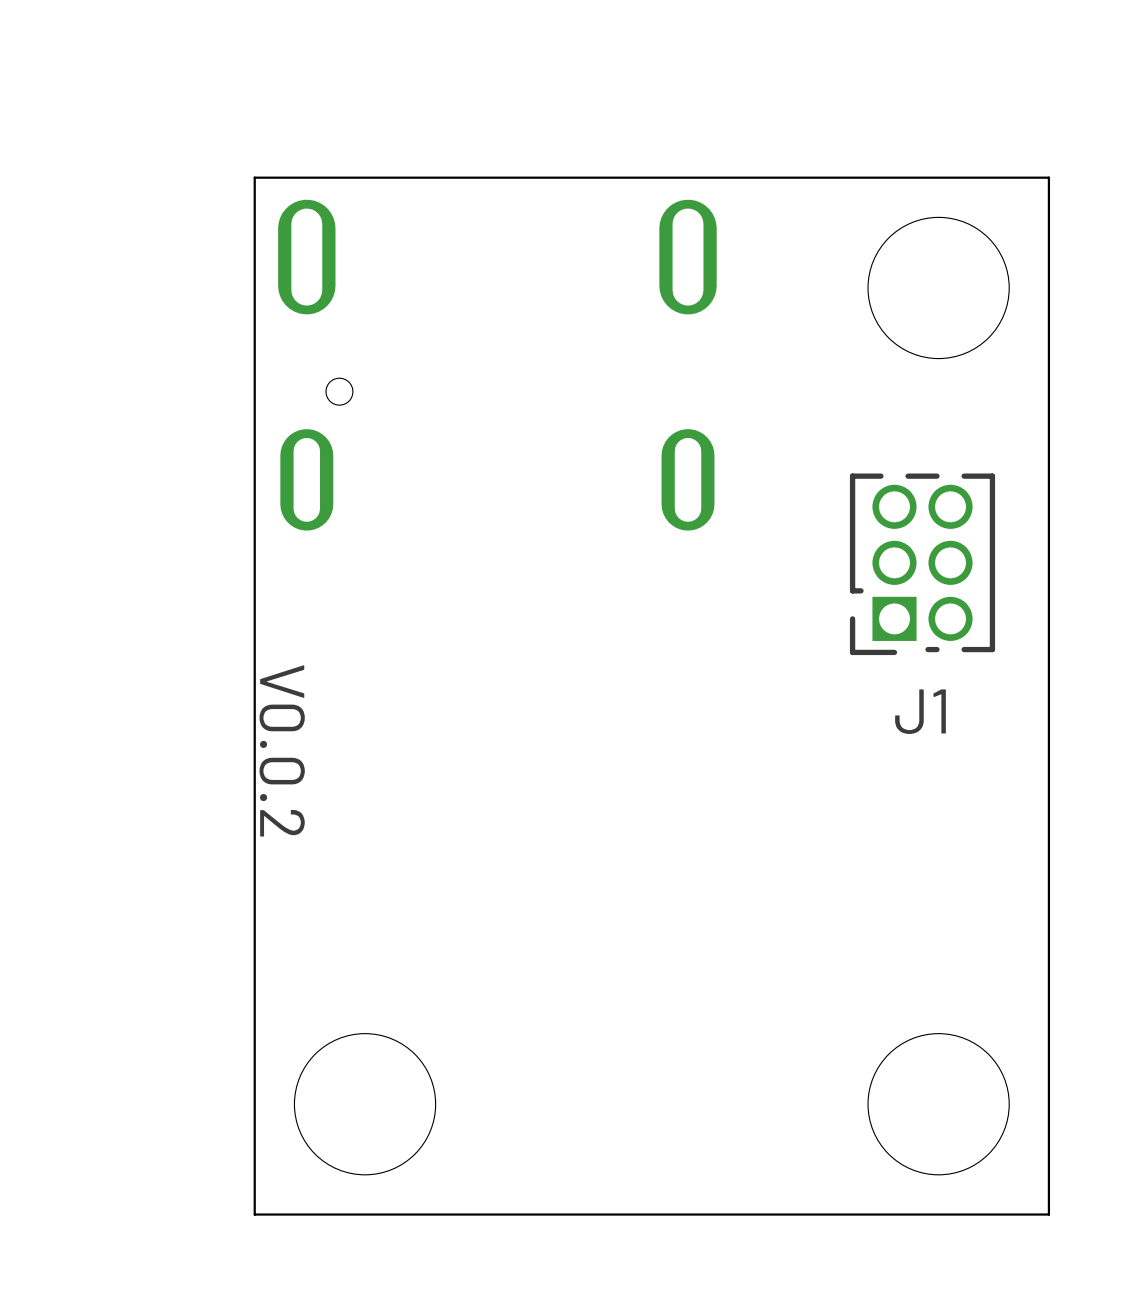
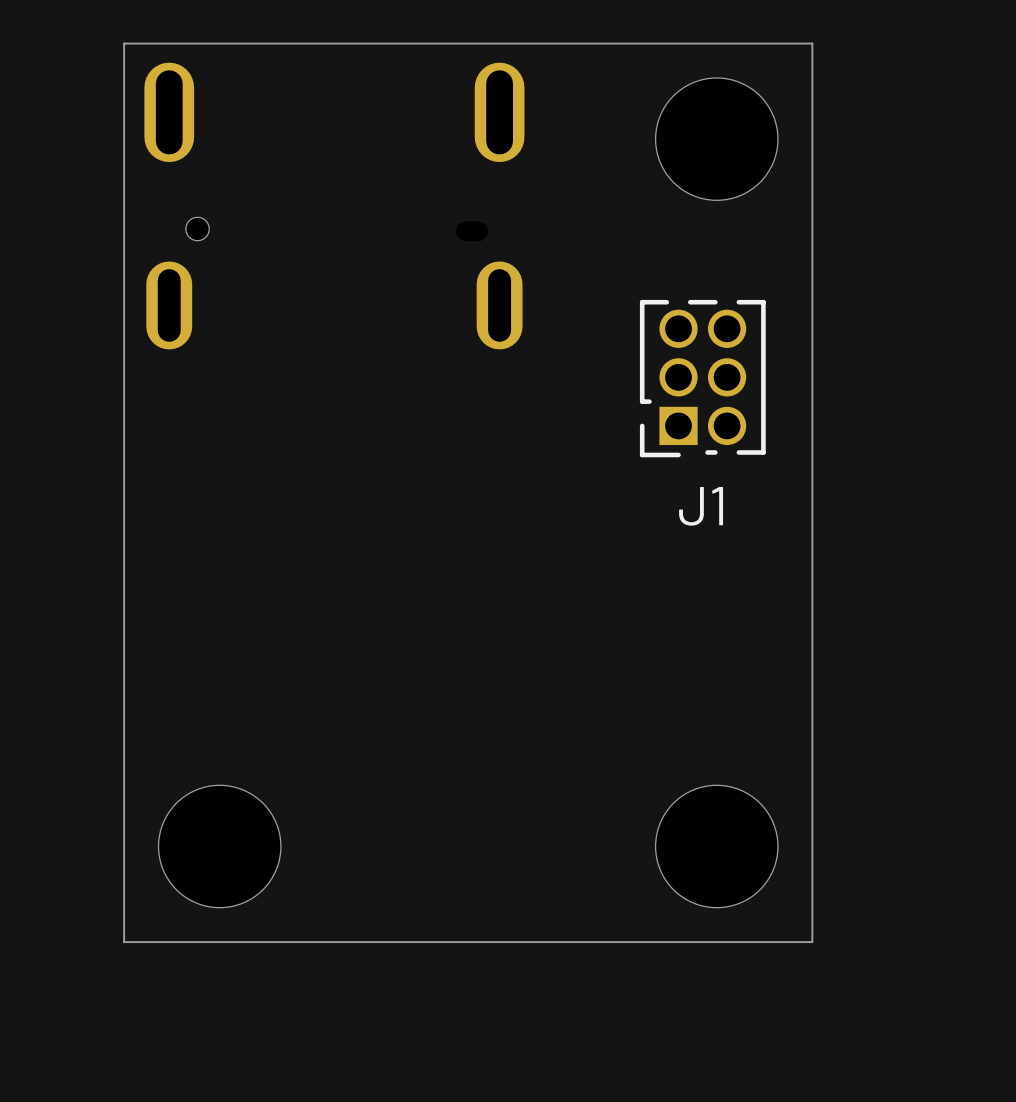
text: V0.0.2 (282, 750) -> none

